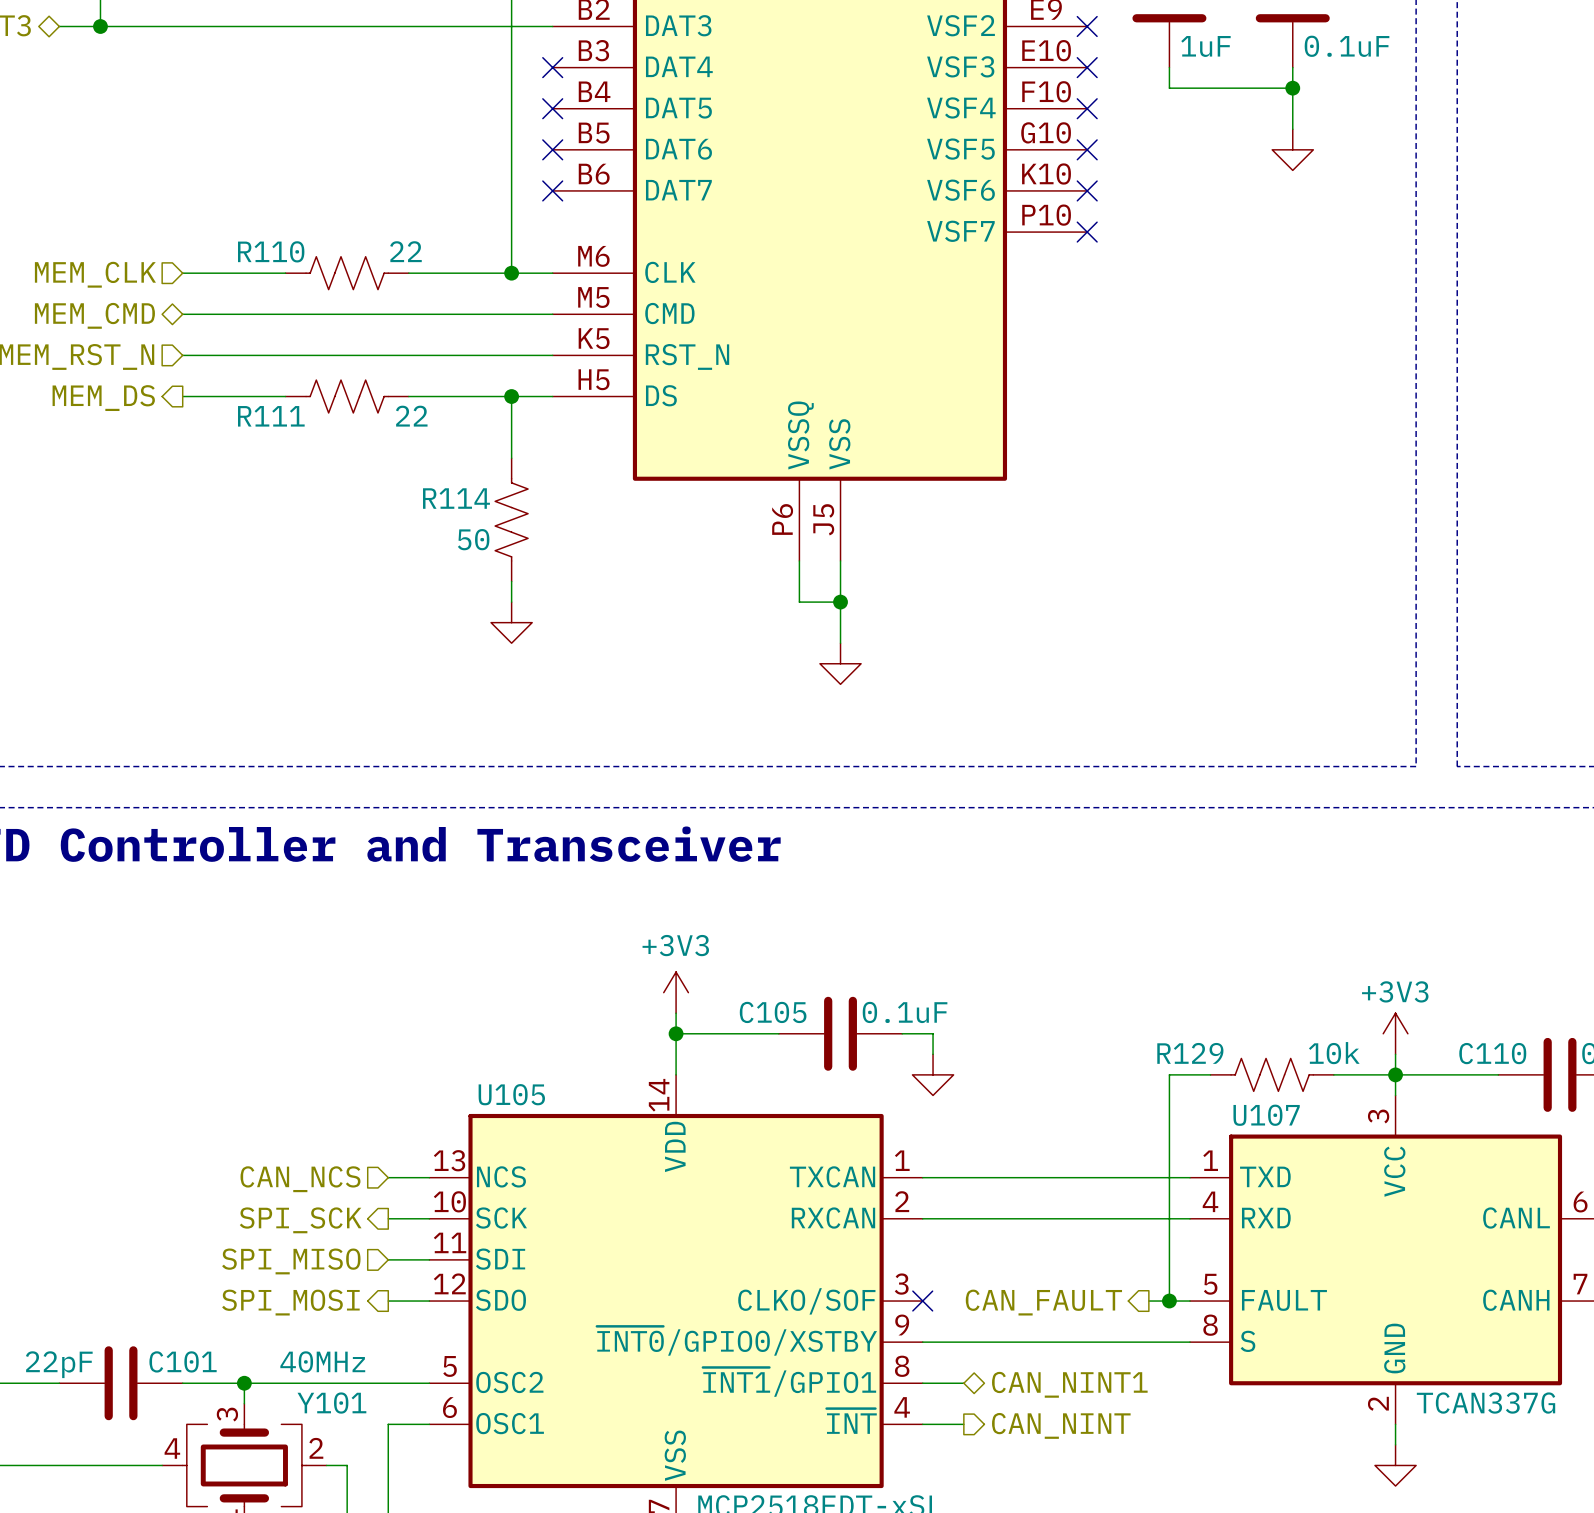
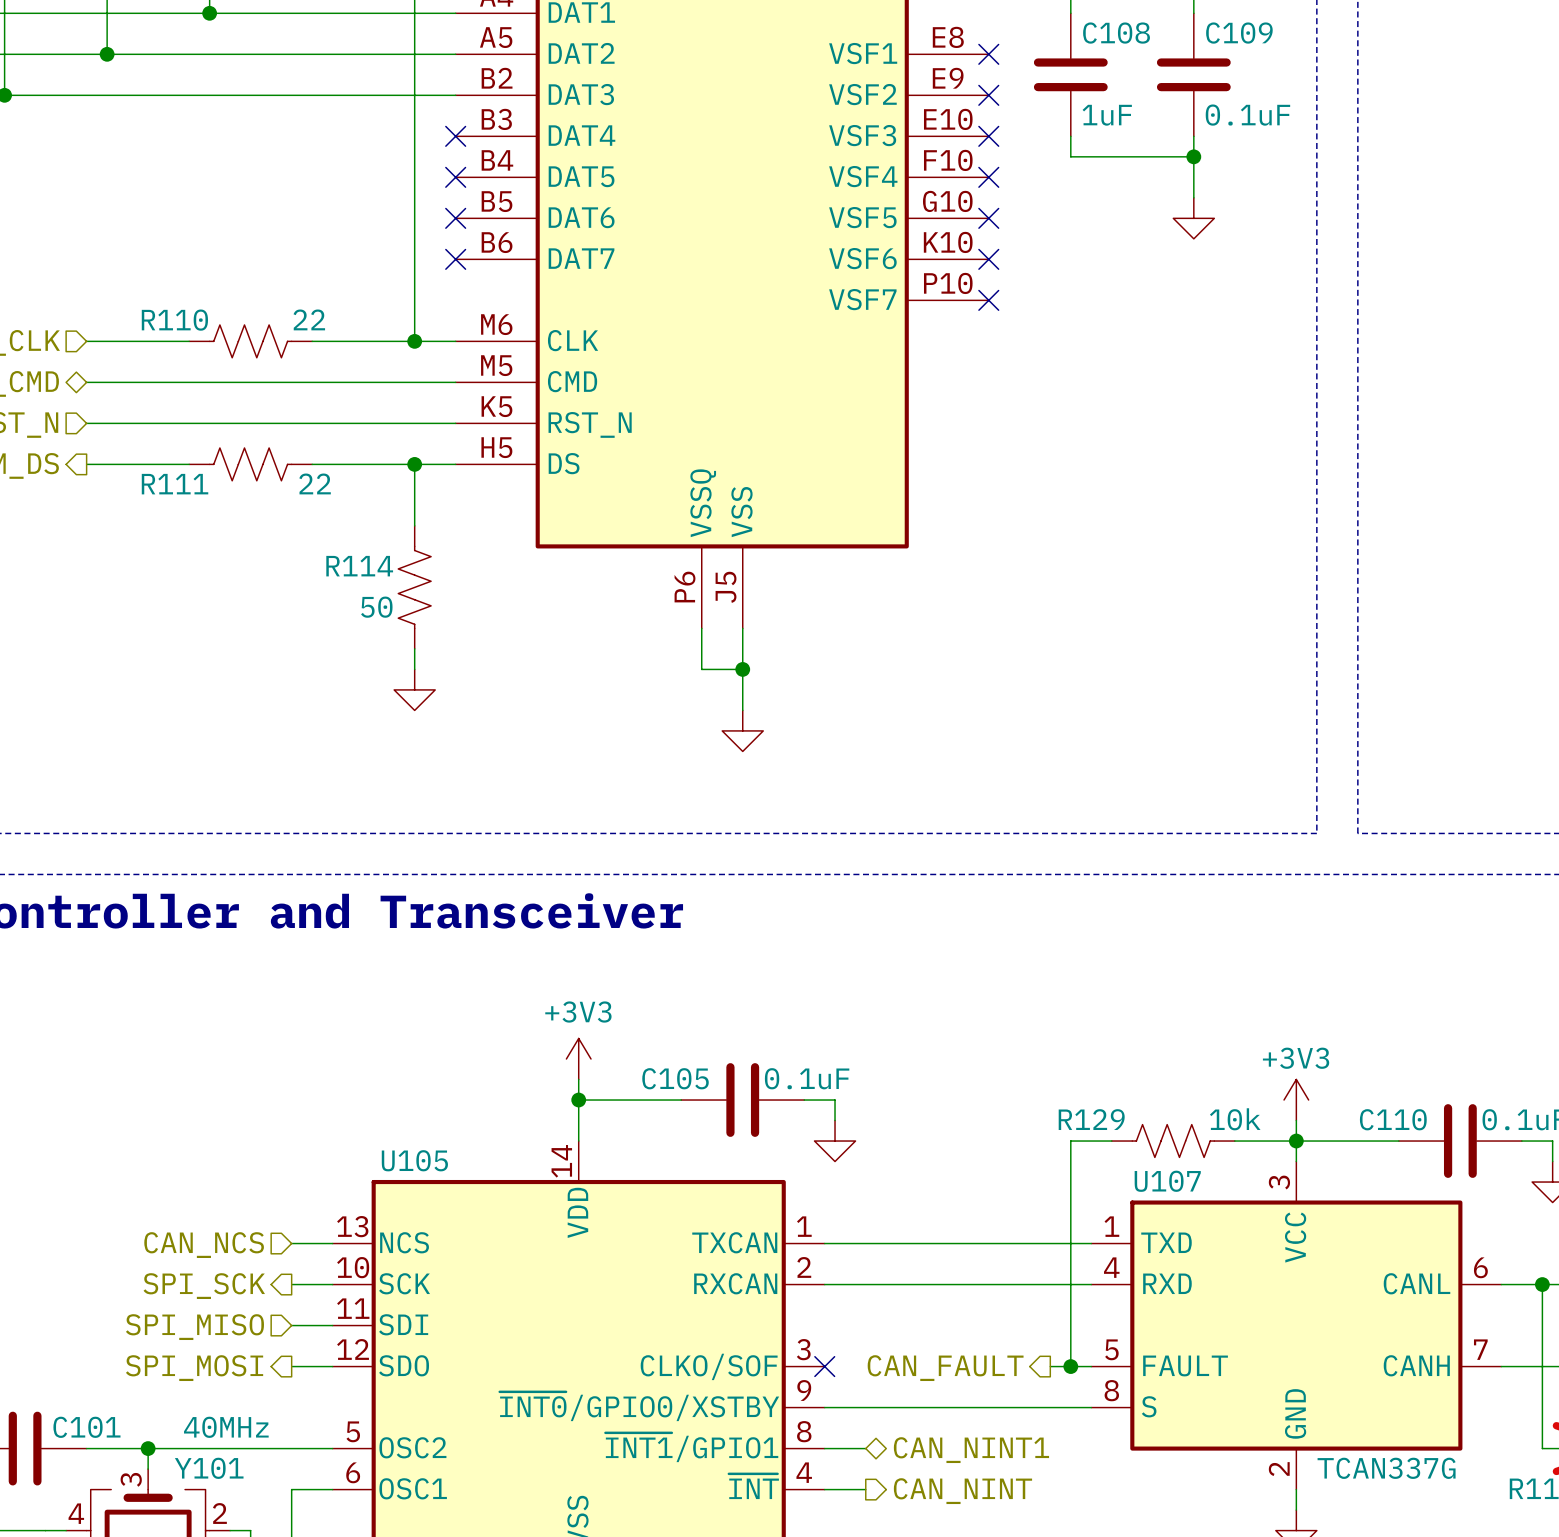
Y101 name position: Y101 (331, 1403) -> Y101 (209, 1468)

